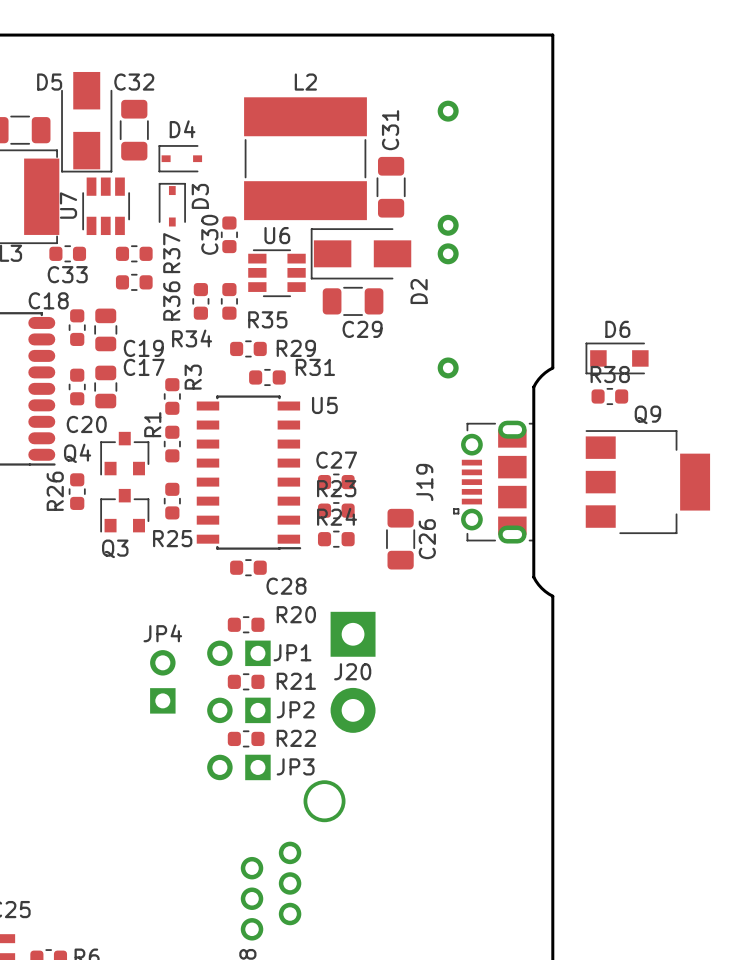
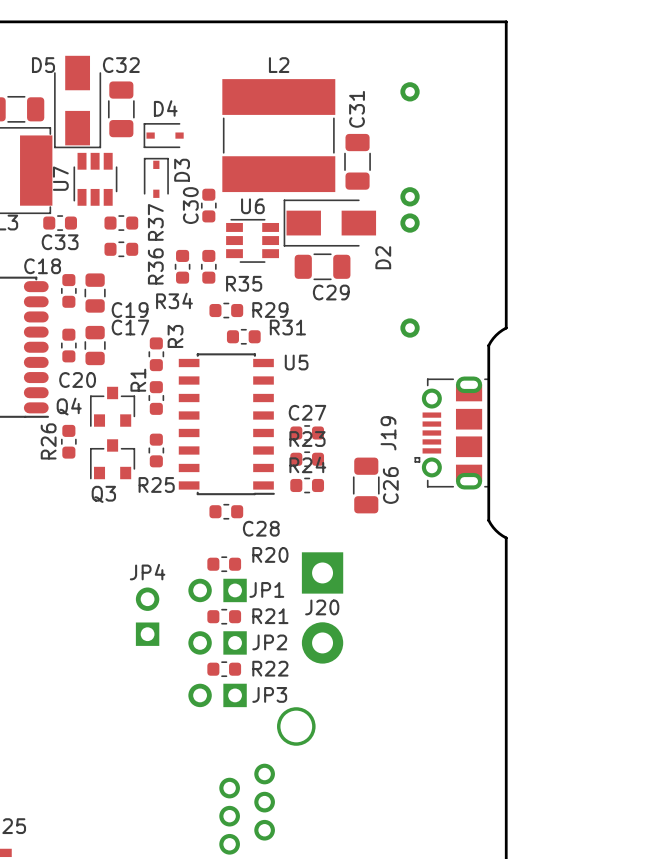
D6: (617, 358) -> none
R38: (609, 396) -> none
Q9: (647, 482) -> none

